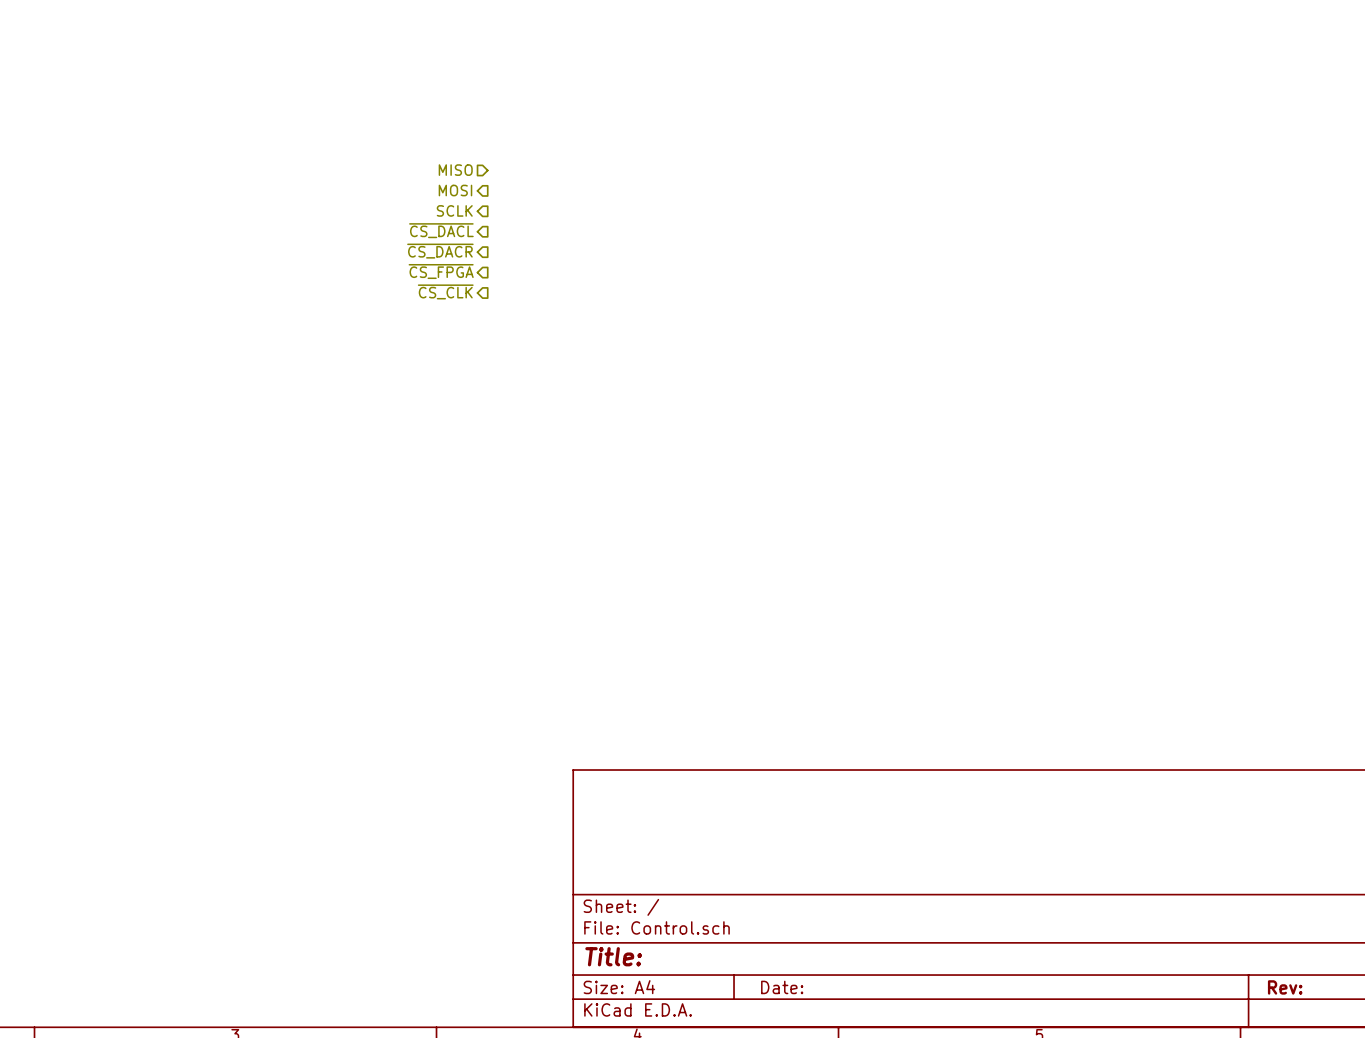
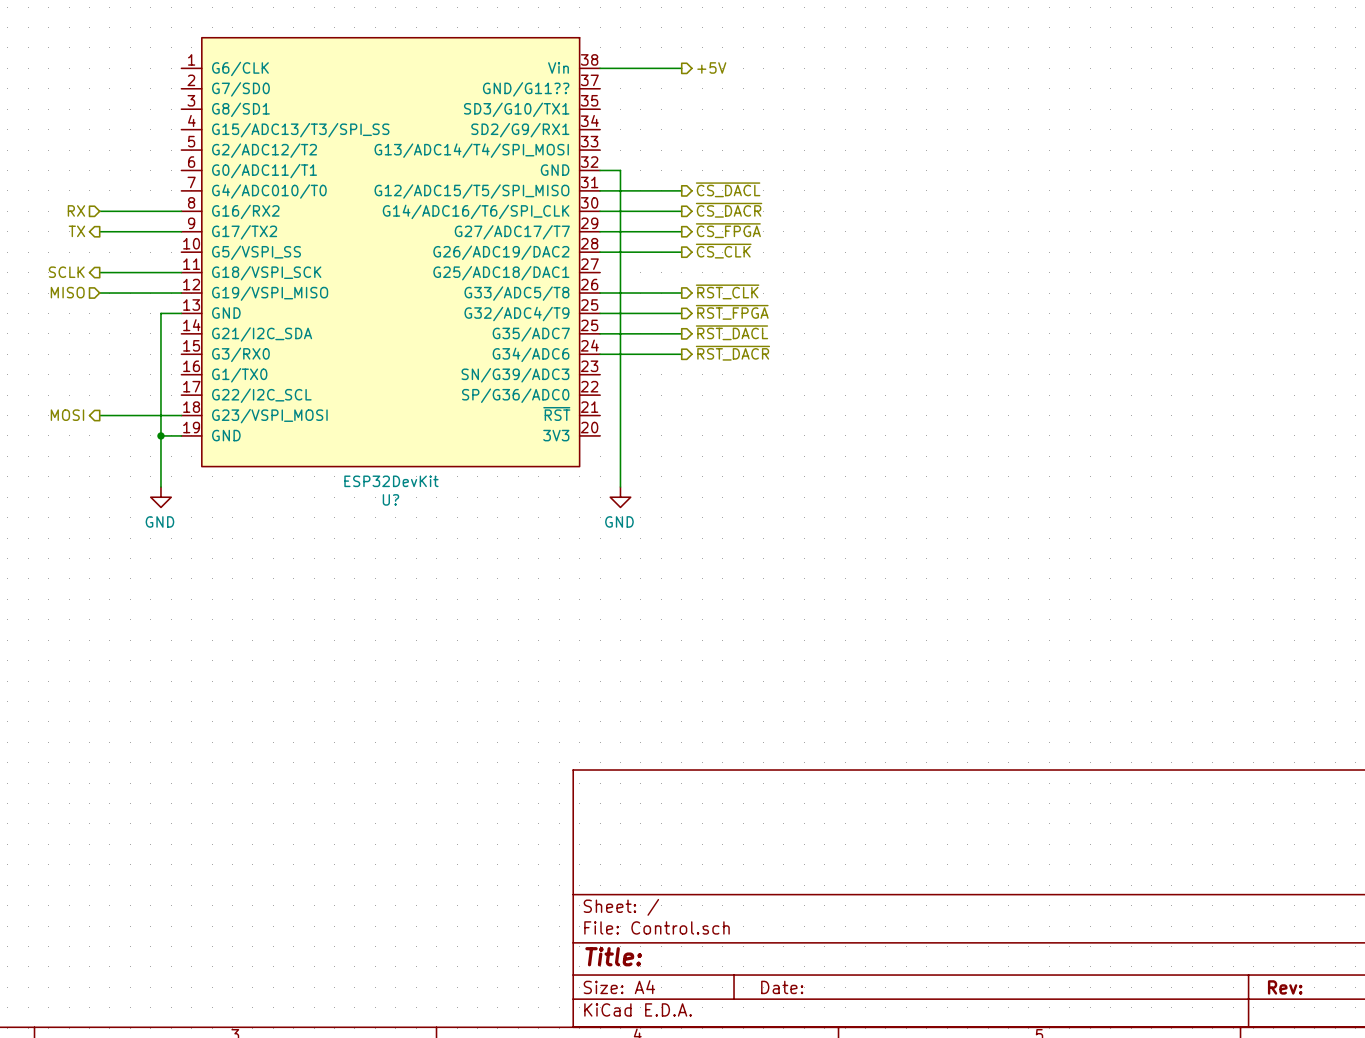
hierarchical label: none -> +5V (711, 67)
wire: none -> (600, 68) (681, 68)
hierarchical label: MISO (455, 170) -> none
wire: none -> (600, 170) (620, 170) (620, 487)
hierarchical label: none -> ~{CS_DACL} (728, 189)
hierarchical label: MOSI (455, 190) -> none
wire: none -> (600, 190) (681, 190)
hierarchical label: none -> RX (76, 210)
hierarchical label: SCLK (454, 210) -> none
hierarchical label: none -> ~{CS_DACR} (729, 210)
wire: none -> (99, 211) (181, 211)
wire: none -> (600, 211) (681, 211)
hierarchical label: ~{CS_DACL} (441, 230) -> none
hierarchical label: none -> ~{CS_FPGA} (728, 230)
hierarchical label: none -> TX (76, 231)
wire: none -> (99, 231) (181, 231)
wire: none -> (600, 231) (681, 231)
hierarchical label: ~{CS_DACR} (440, 251) -> none
hierarchical label: none -> ~{CS_CLK} (723, 251)
U?: none -> ESP32DevKit (390, 252)
wire: none -> (600, 252) (681, 252)
hierarchical label: ~{CS_FPGA} (441, 271) -> none
hierarchical label: none -> SCLK (66, 272)
wire: none -> (99, 272) (181, 272)
hierarchical label: ~{CS_CLK} (445, 291) -> none
hierarchical label: none -> ~{RST_CLK} (727, 291)
hierarchical label: none -> MISO (67, 292)
wire: none -> (99, 293) (181, 293)
wire: none -> (600, 293) (681, 293)
hierarchical label: none -> ~{RST_FPGA} (732, 312)
wire: none -> (181, 313) (160, 313) (160, 487)
wire: none -> (600, 313) (681, 313)
hierarchical label: none -> ~{RST_DACL} (732, 332)
wire: none -> (600, 333) (681, 333)
hierarchical label: none -> ~{RST_DACR} (732, 353)
wire: none -> (600, 354) (681, 354)
hierarchical label: none -> MOSI (67, 415)
wire: none -> (99, 415) (181, 415)
wire: none -> (160, 435) (181, 435)
junction: none -> (160, 435)
power symbol: none -> GND (160, 497)
power symbol: none -> GND (620, 497)

